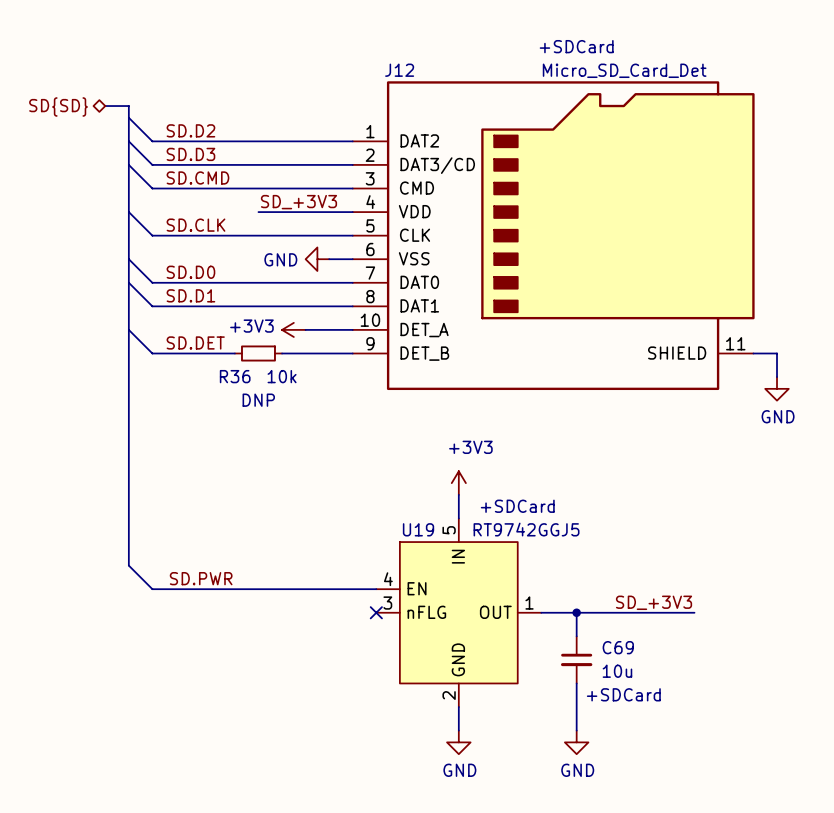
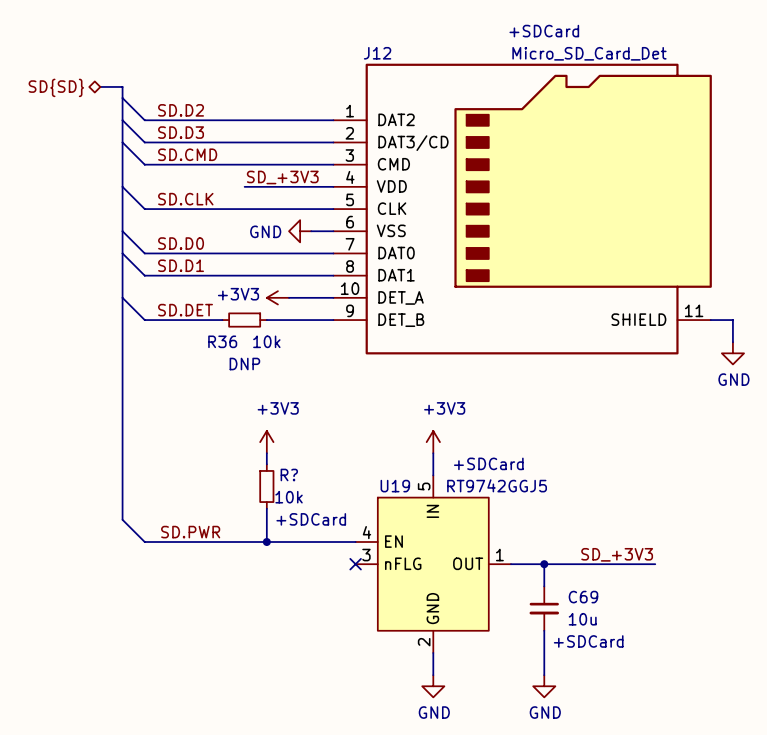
power symbol: none -> +3V3 (266, 442)
wire: none -> (266, 453) (266, 464)
R?: none -> 10k (266, 486)
wire: none -> (266, 508) (266, 542)
junction: none -> (266, 542)

